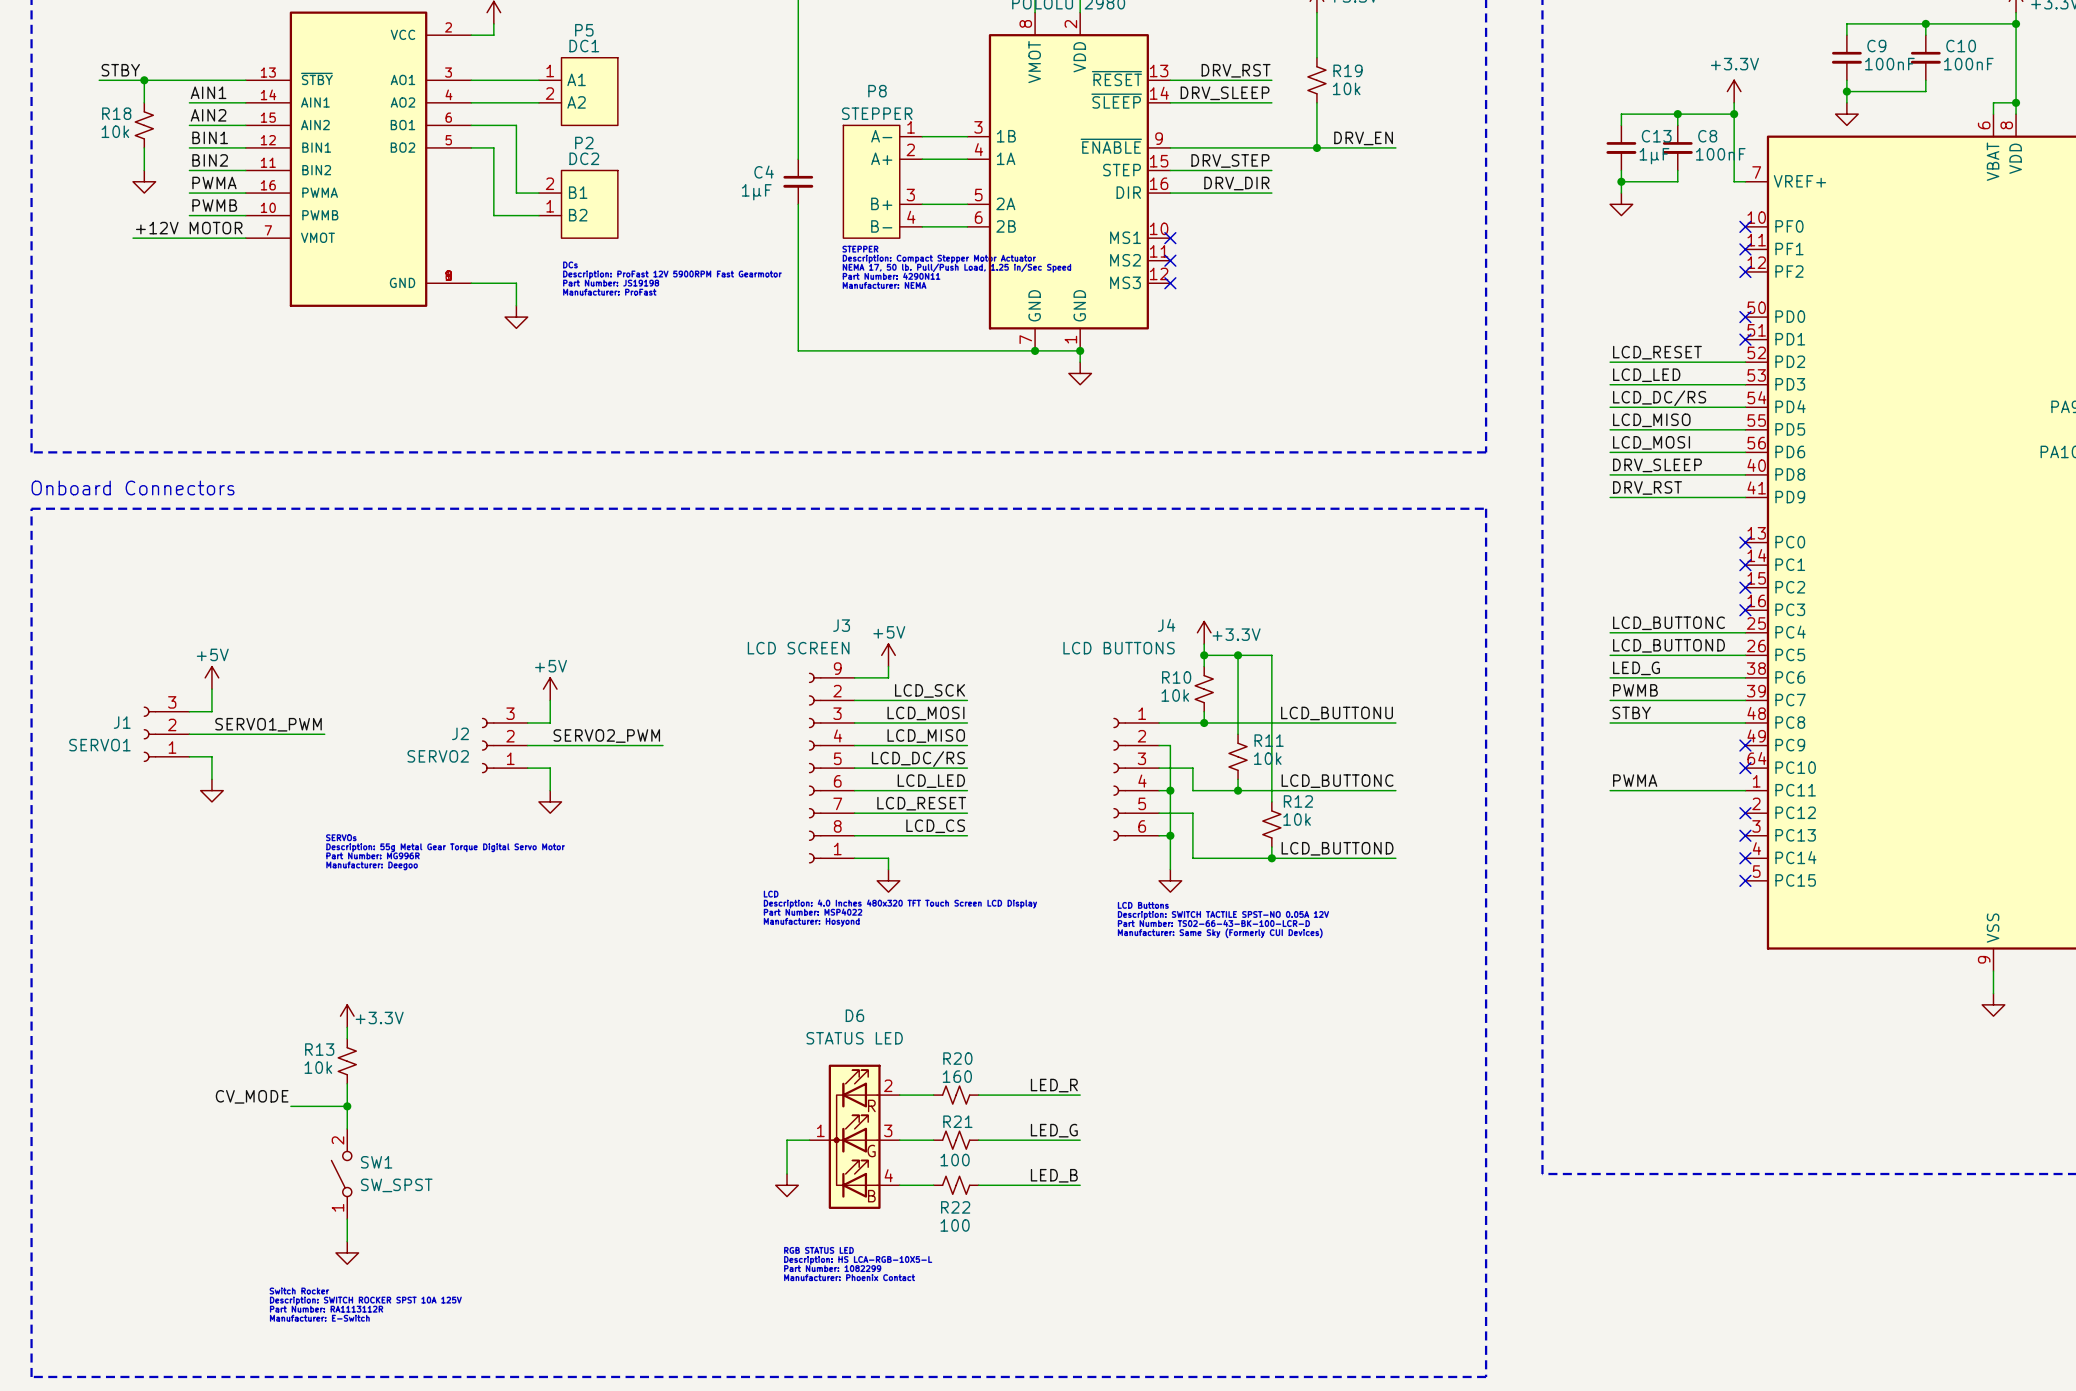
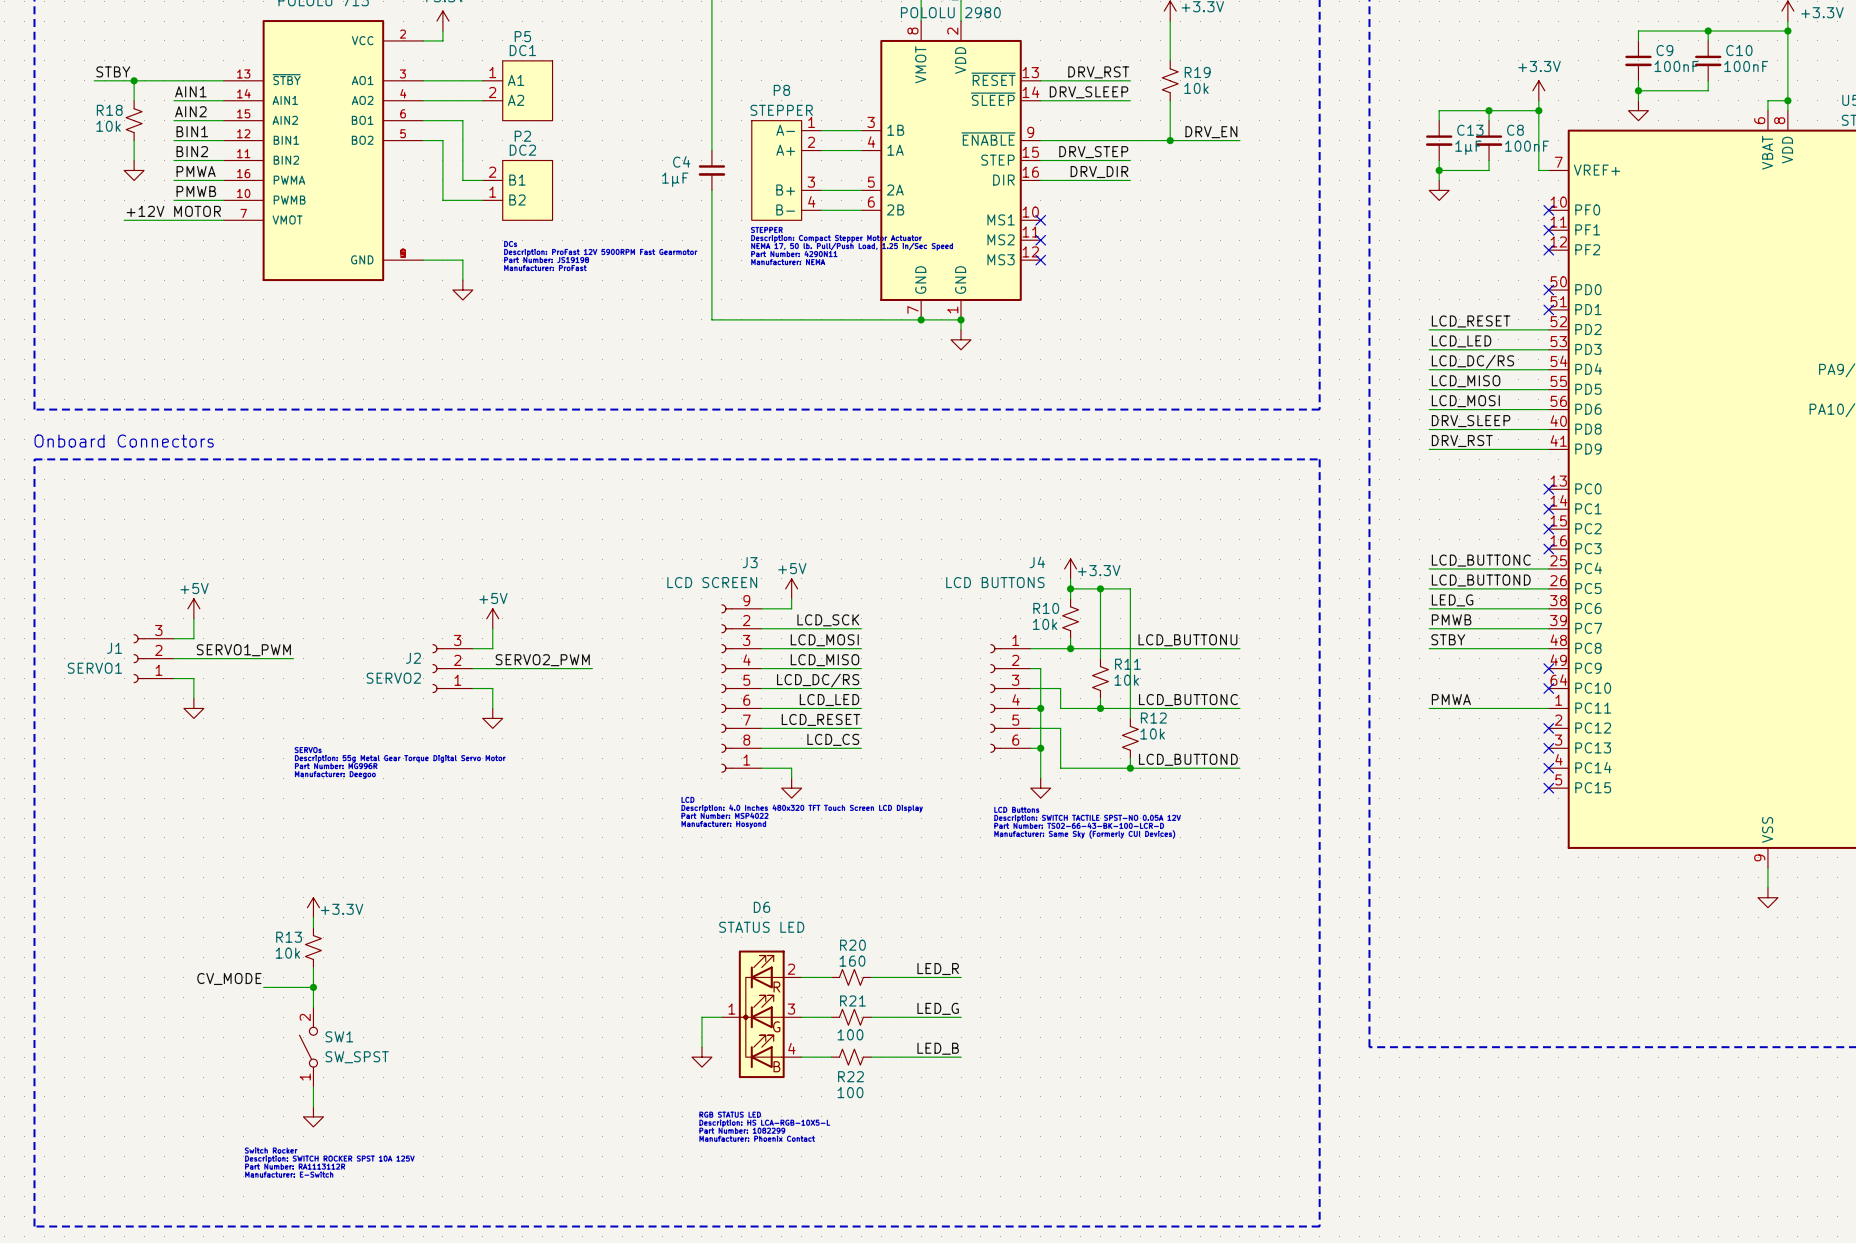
label: PWMA (214, 182) -> PMWA (196, 171)
label: PWMB (214, 205) -> PMWB (196, 191)
label: PWMB (1635, 690) -> PMWB (1451, 619)
label: PWMA (1635, 780) -> PMWA (1451, 699)

